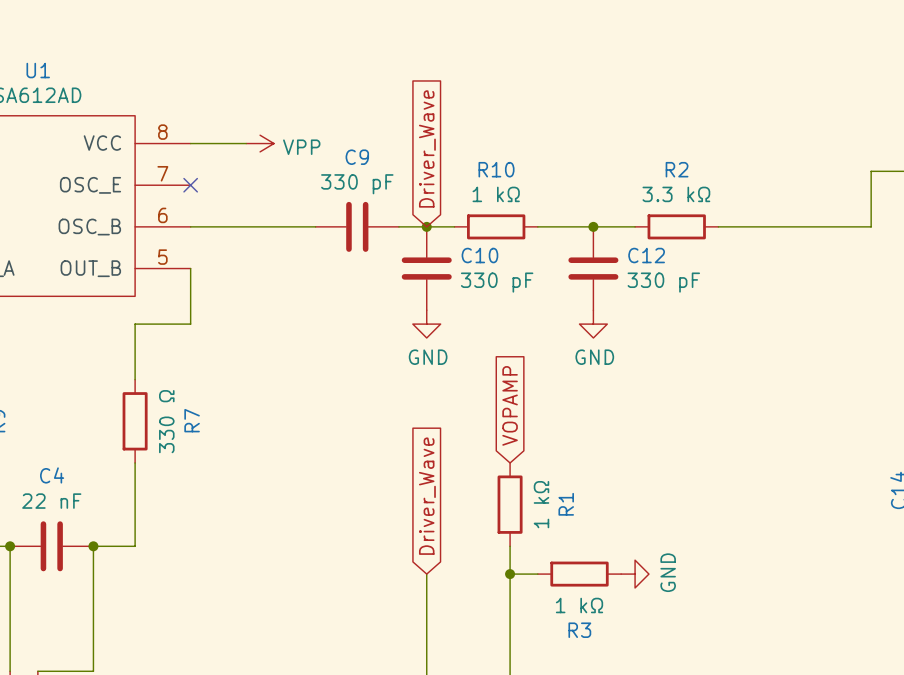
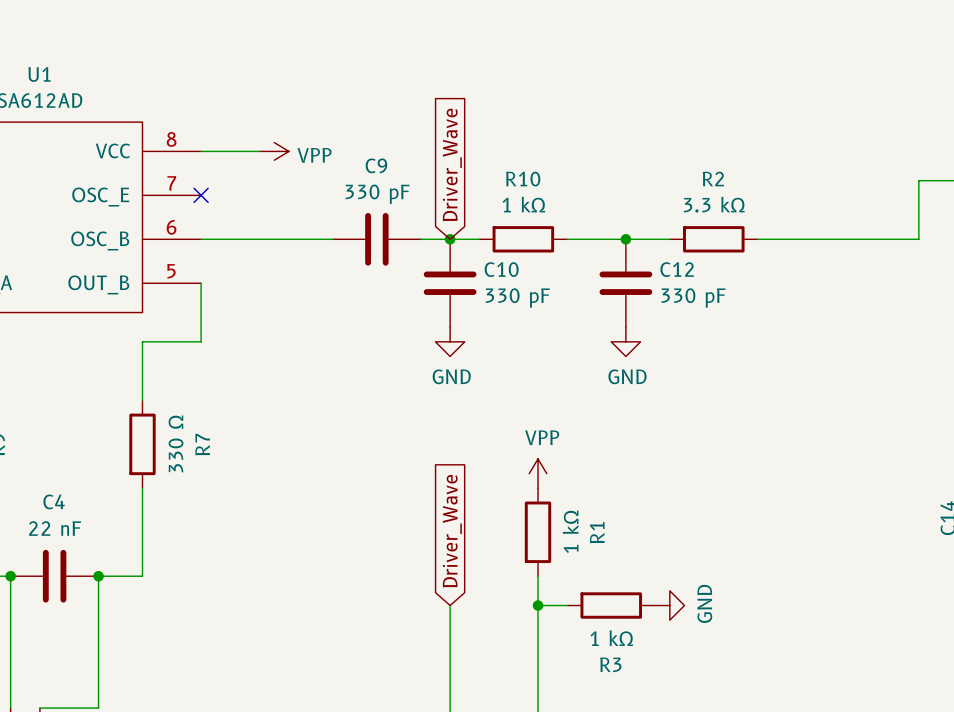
global label: VOPAMP (510, 405) -> none
power symbol: none -> VPP (538, 473)

